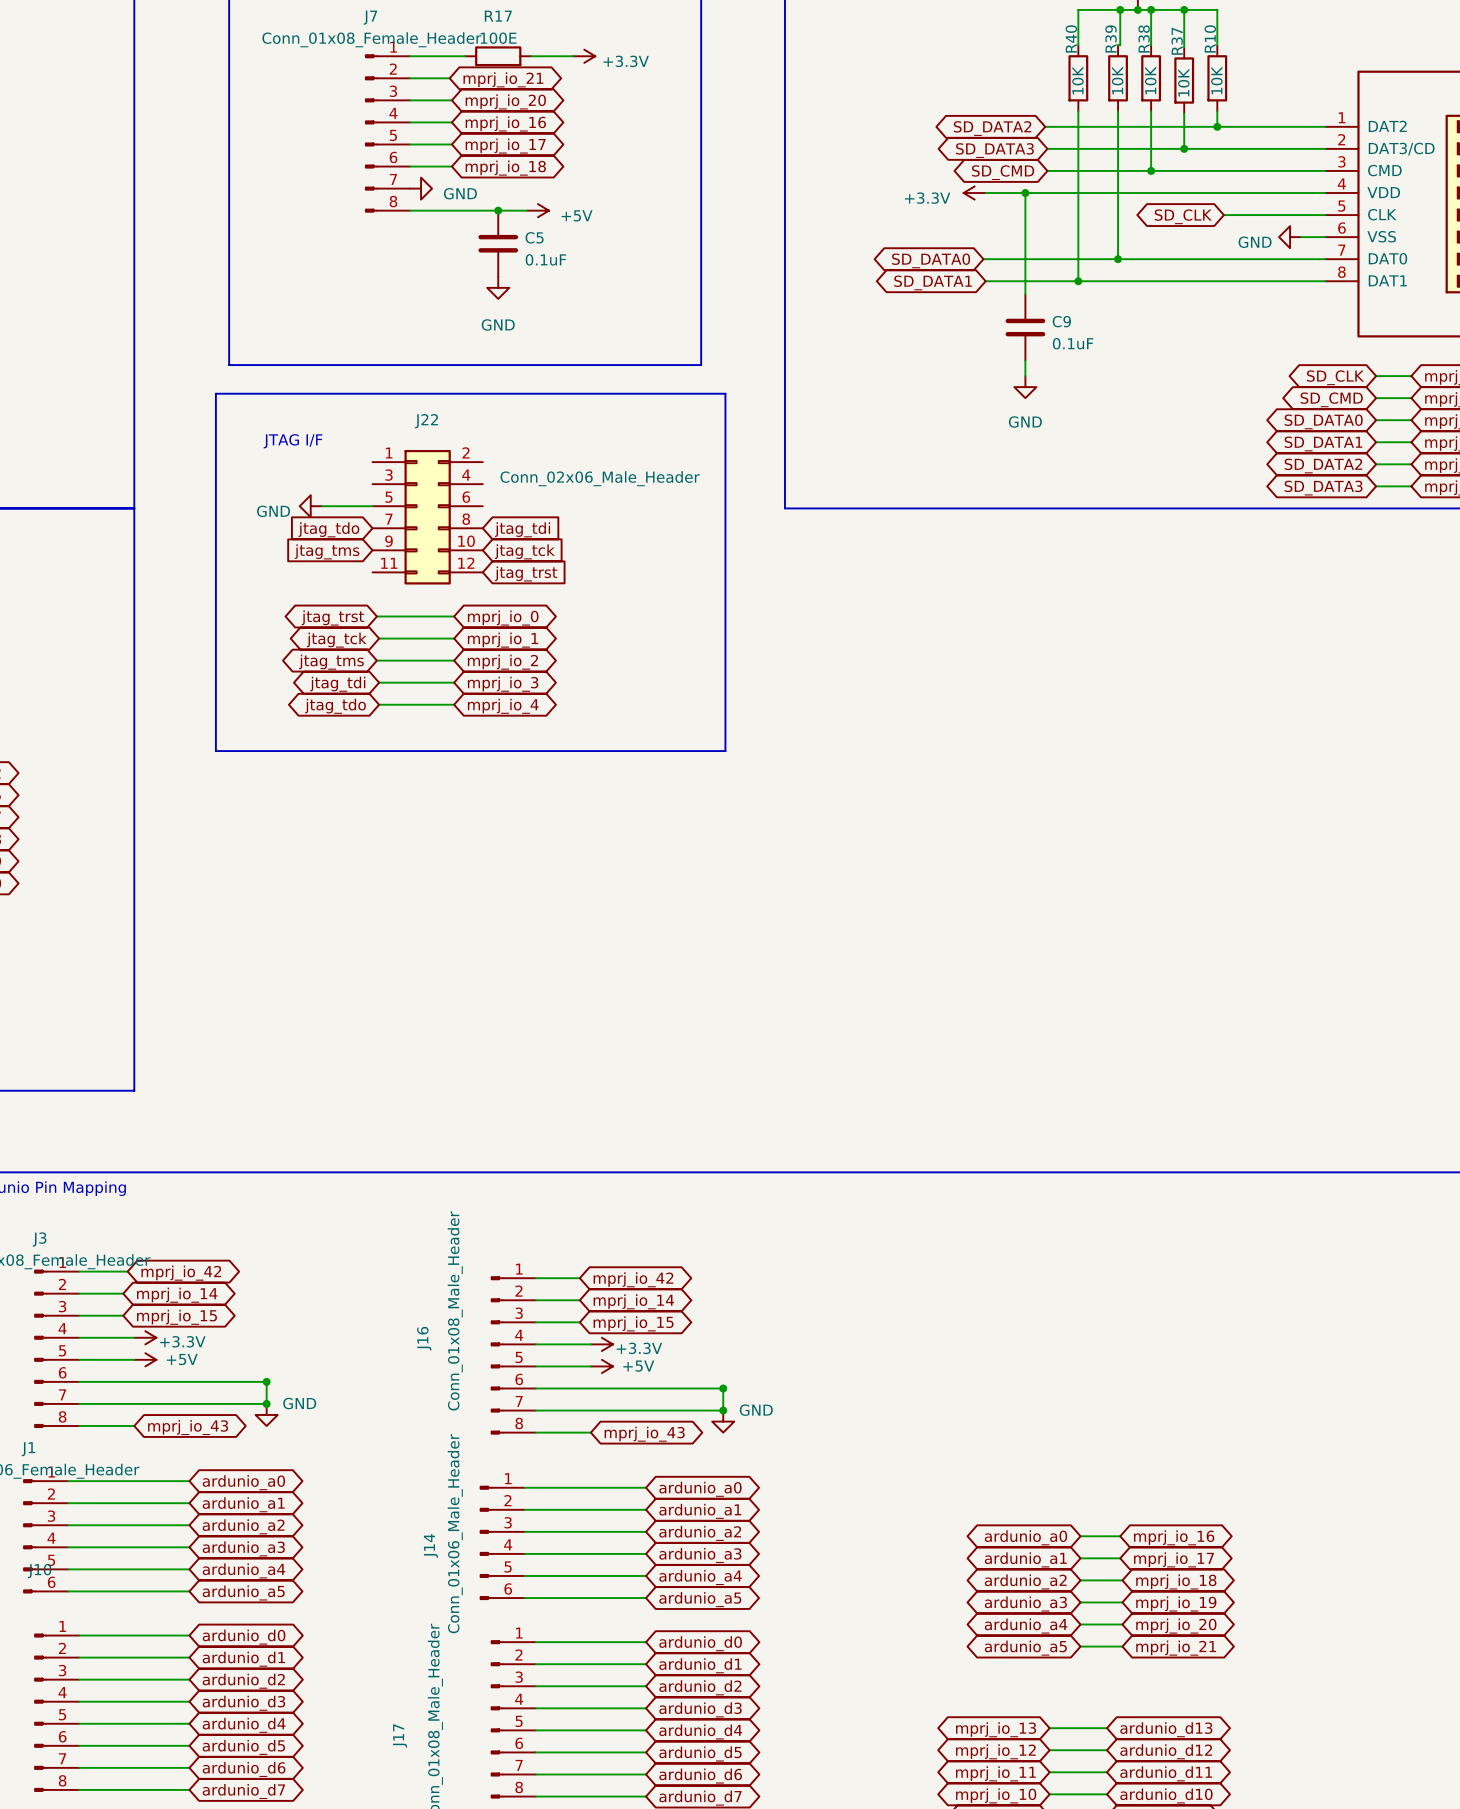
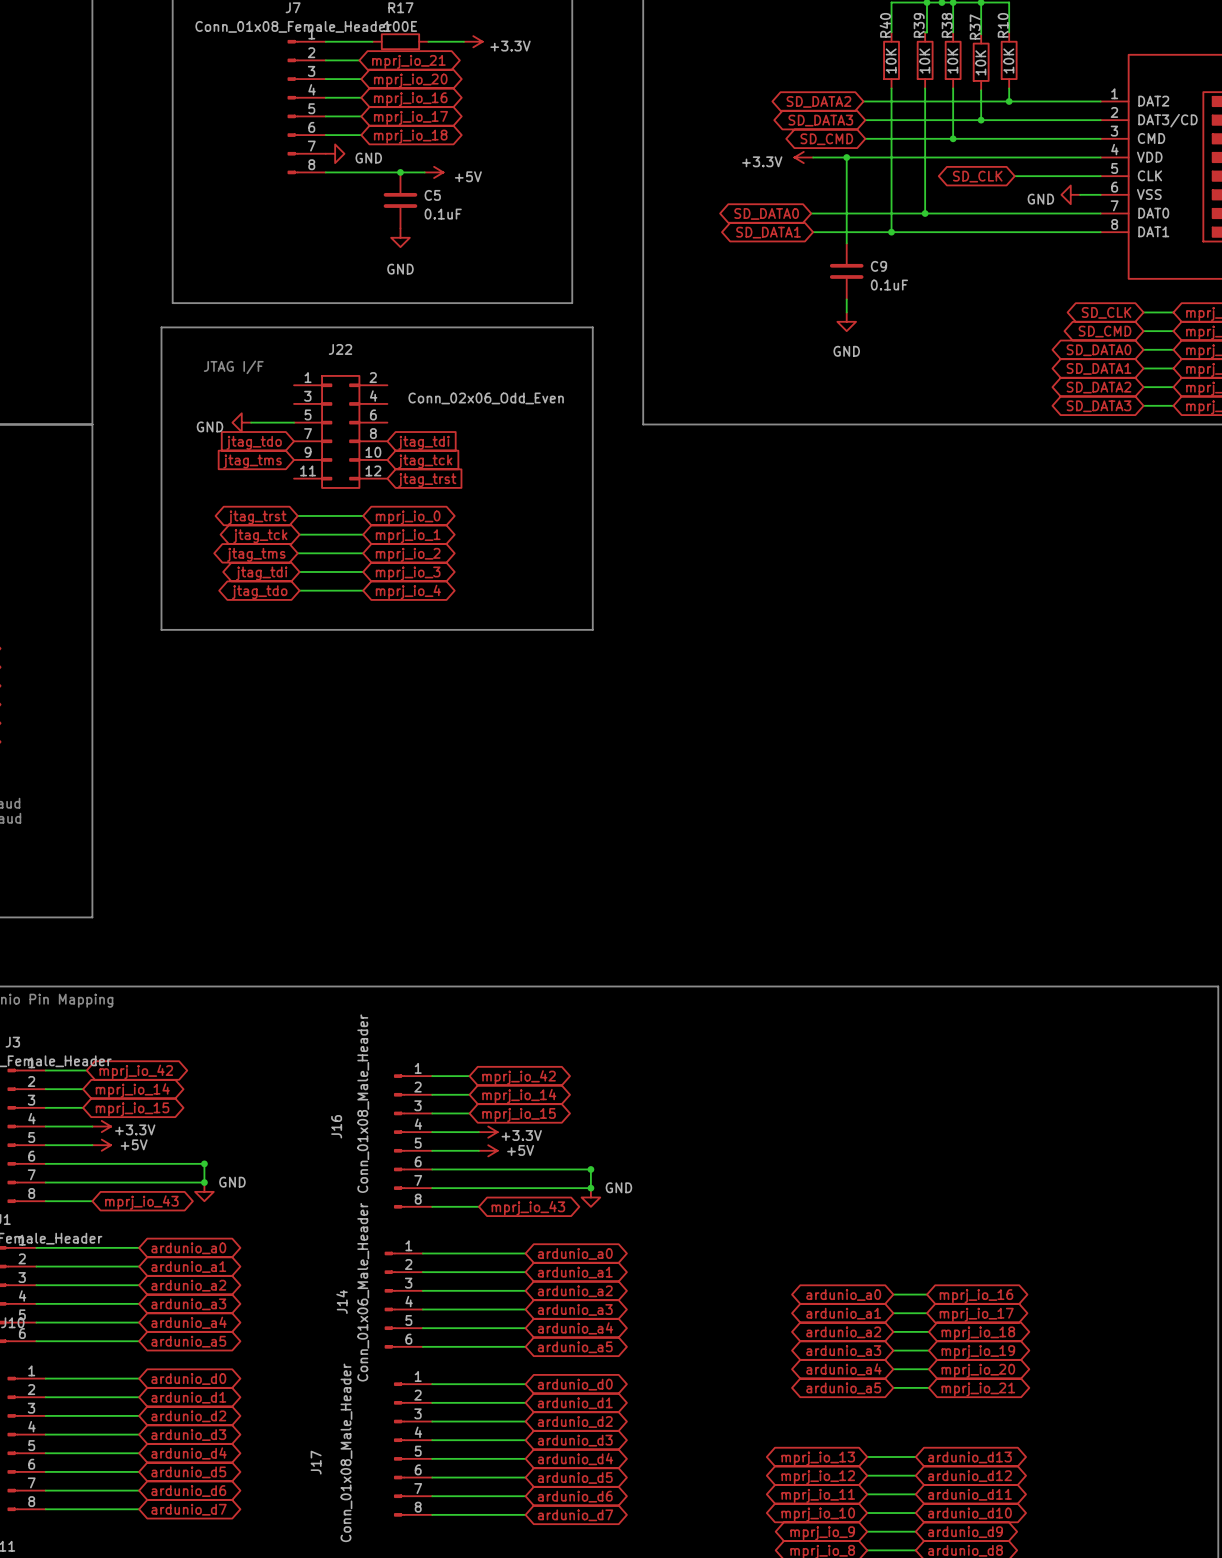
J22 value: Conn_02x06_Male_Header (600, 478) -> Conn_02x06_Odd_Even (486, 398)

